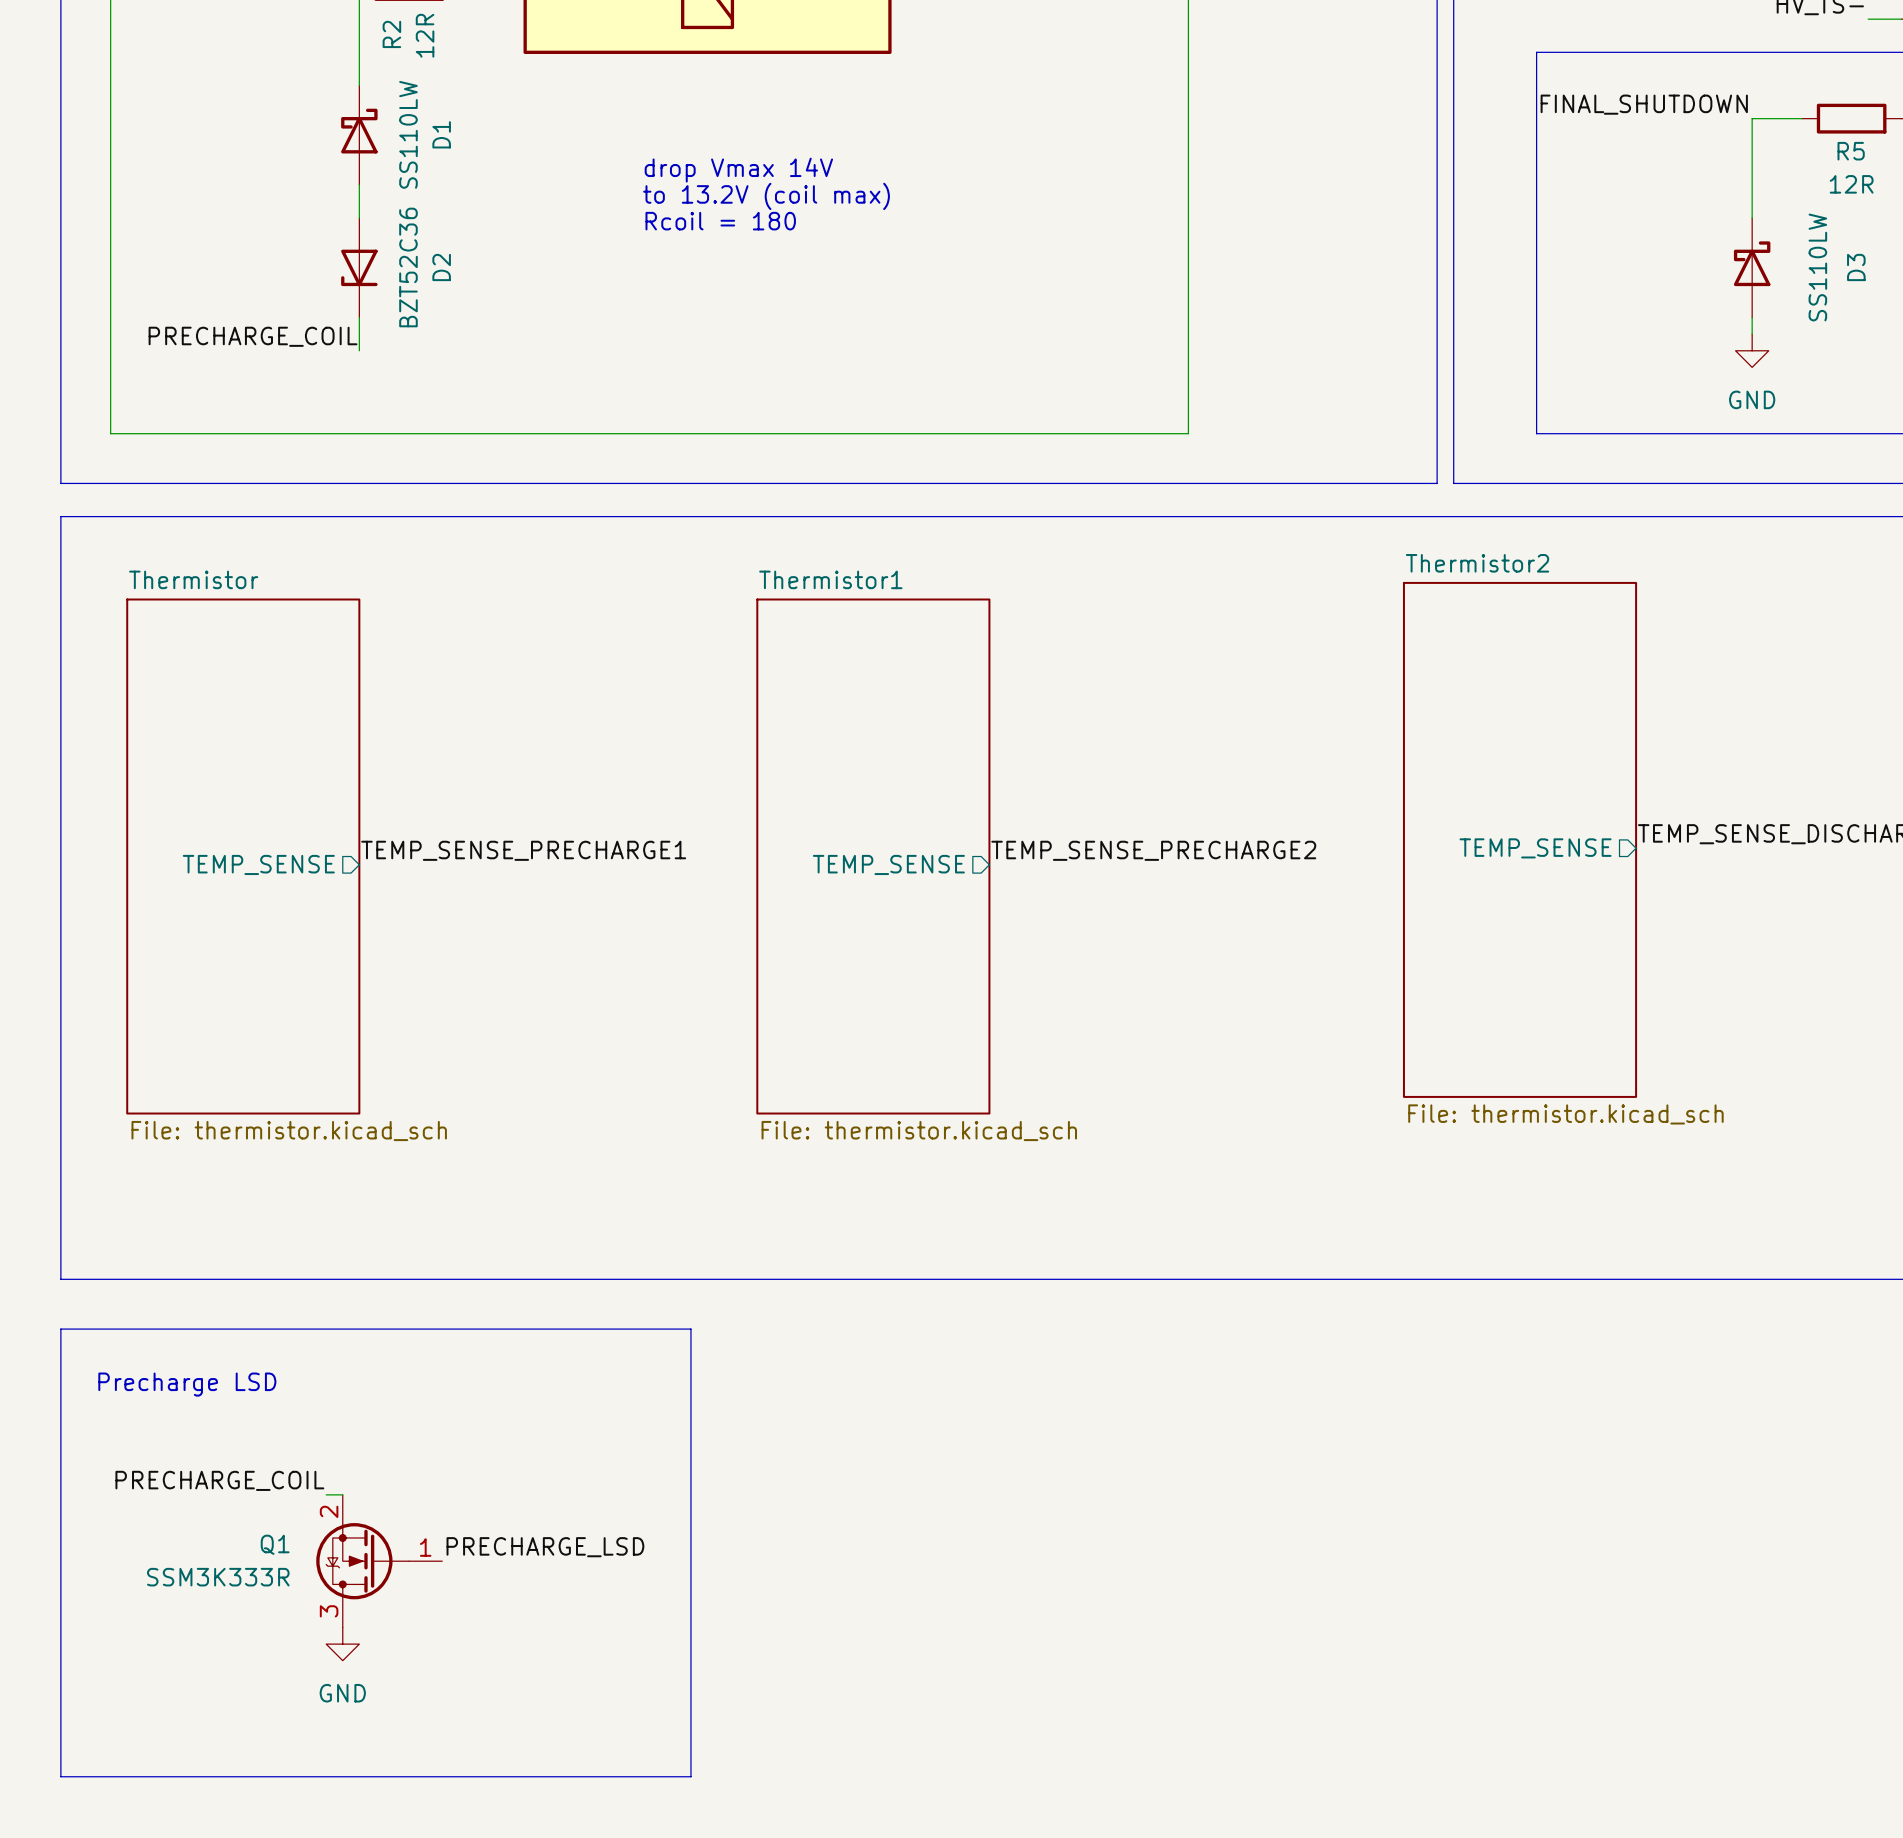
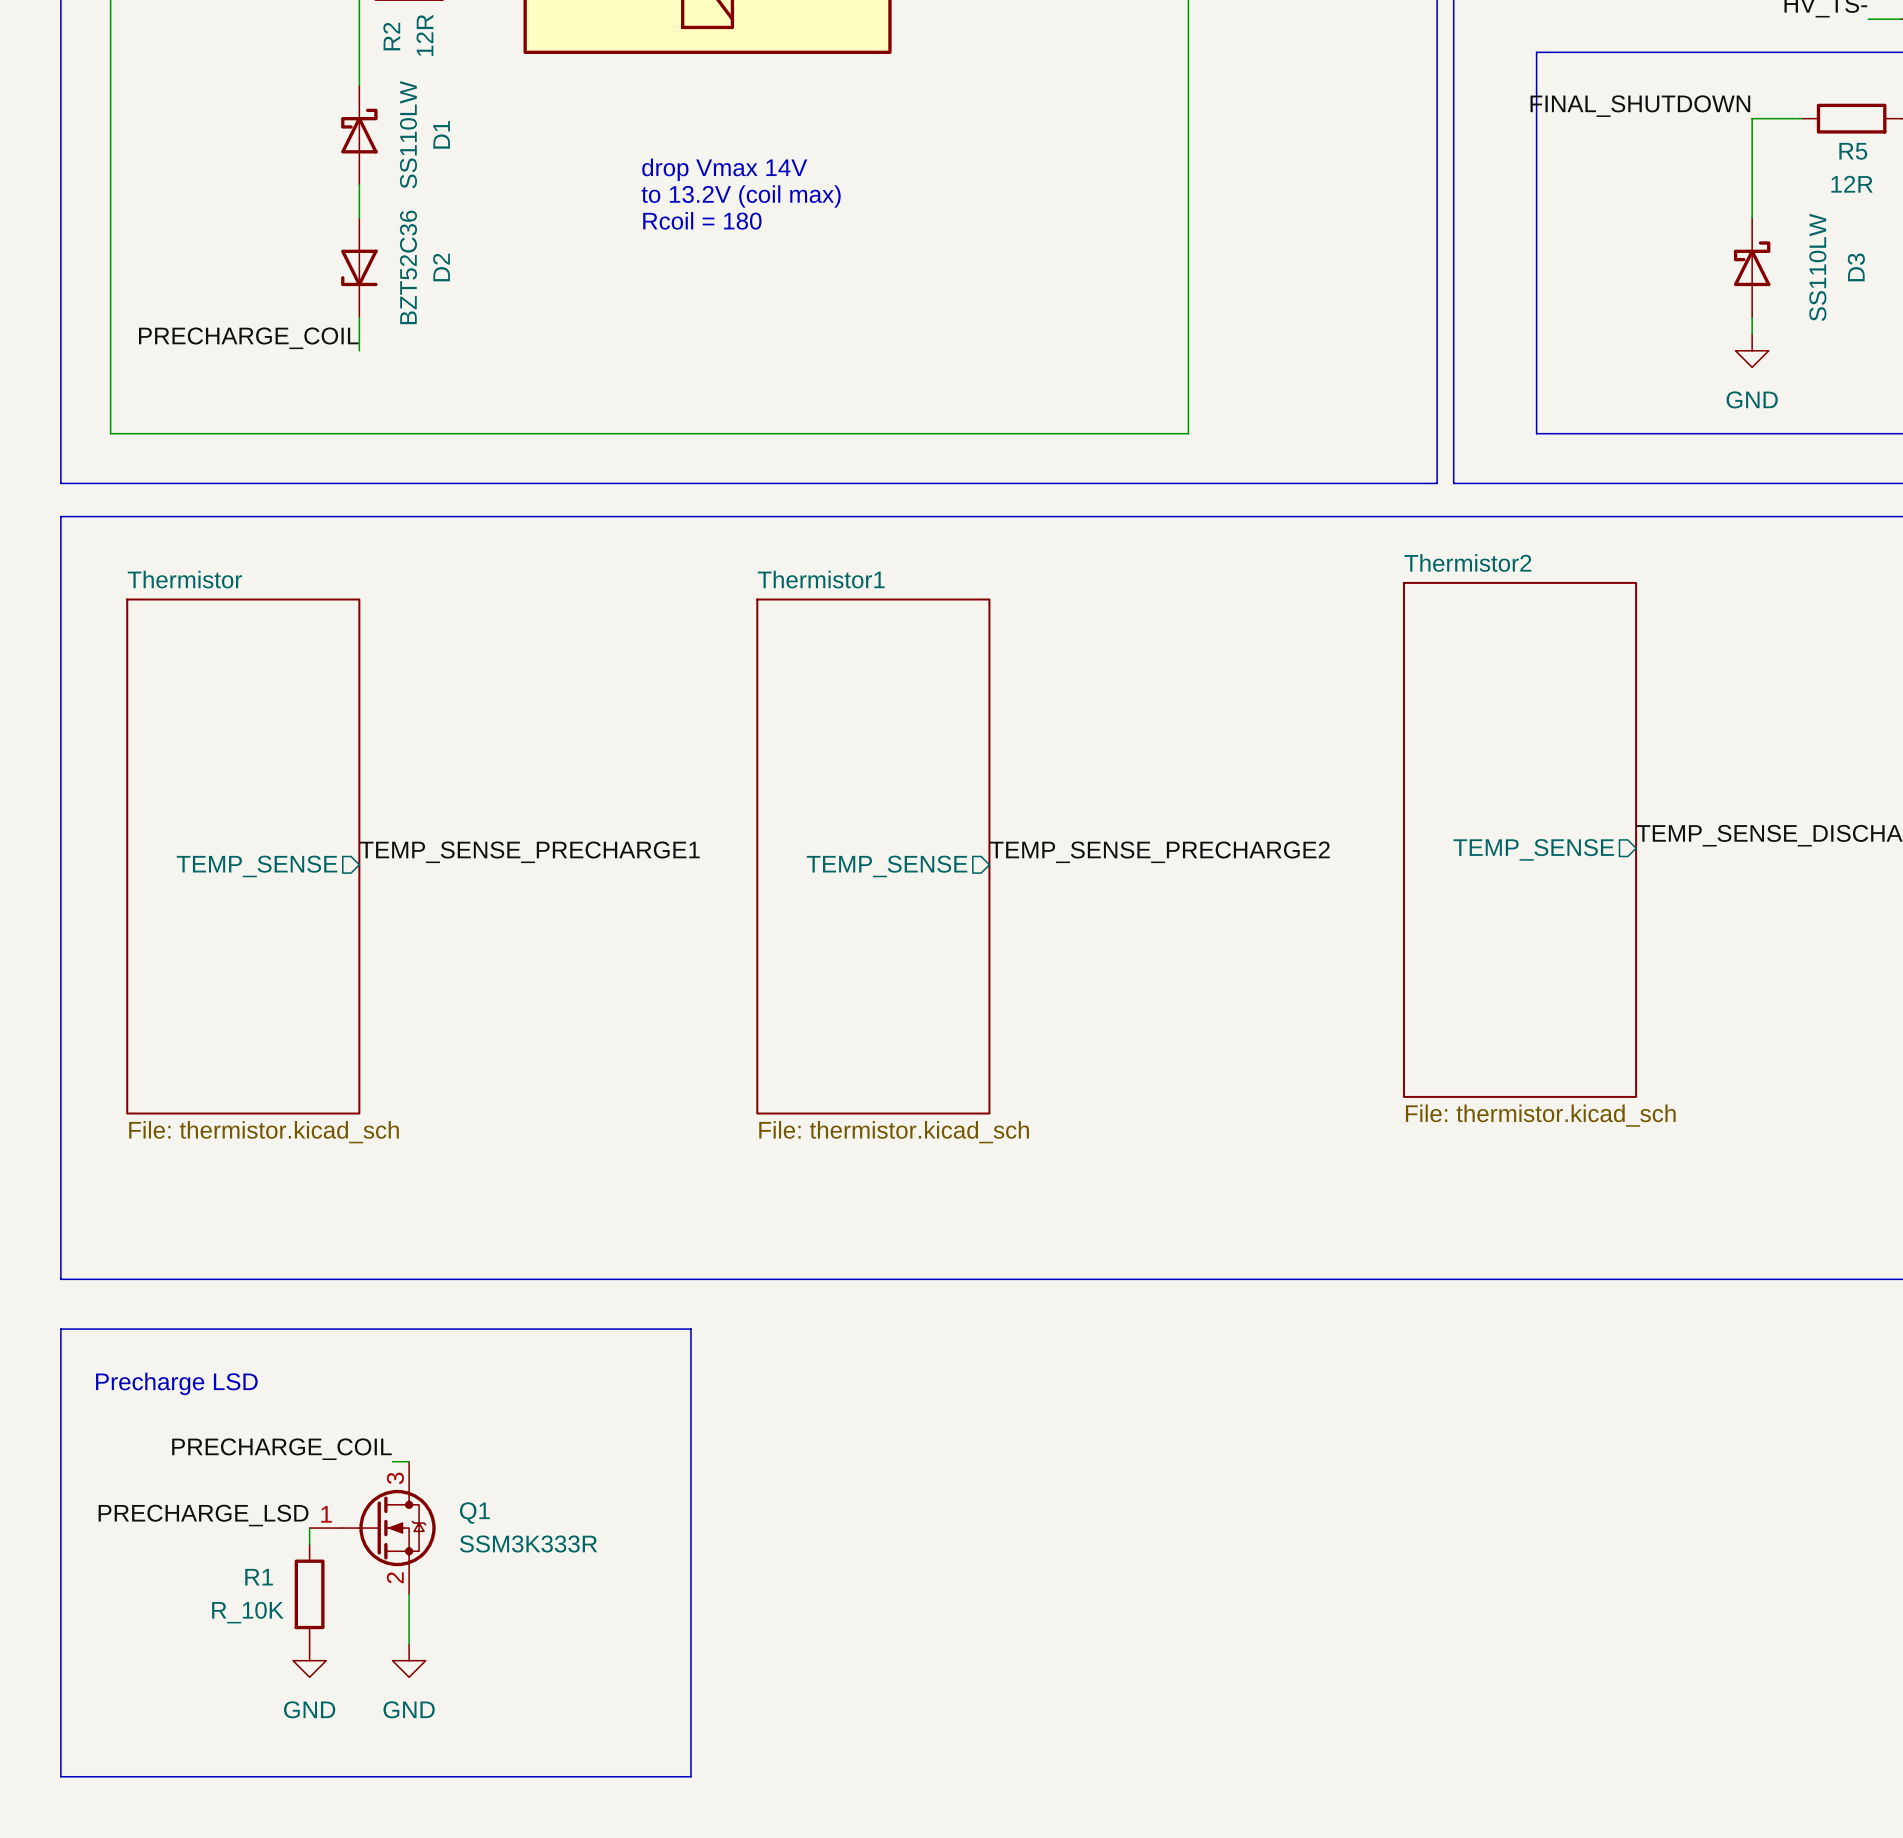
label position: PRECHARGE_COIL (219, 1480) -> PRECHARGE_COIL (281, 1449)
wire: (326, 1494) (342, 1494) -> (392, 1461) (409, 1461)
wire: none -> (309, 1528) (309, 1544)
Q1 name position: Q1 (275, 1544) -> Q1 (474, 1512)
label position: PRECHARGE_LSD (545, 1547) -> PRECHARGE_LSD (203, 1515)
Q1 rotation: 0° (362, 1561) -> 180° (389, 1528)
Q1 value position: SSM3K333R (218, 1577) -> SSM3K333R (528, 1543)
R1: none -> R_10K (309, 1594)
wire: none -> (409, 1594) (409, 1644)
power symbol: GND (342, 1644) -> none
power symbol: none -> GND (309, 1660)
power symbol: none -> GND (409, 1660)

